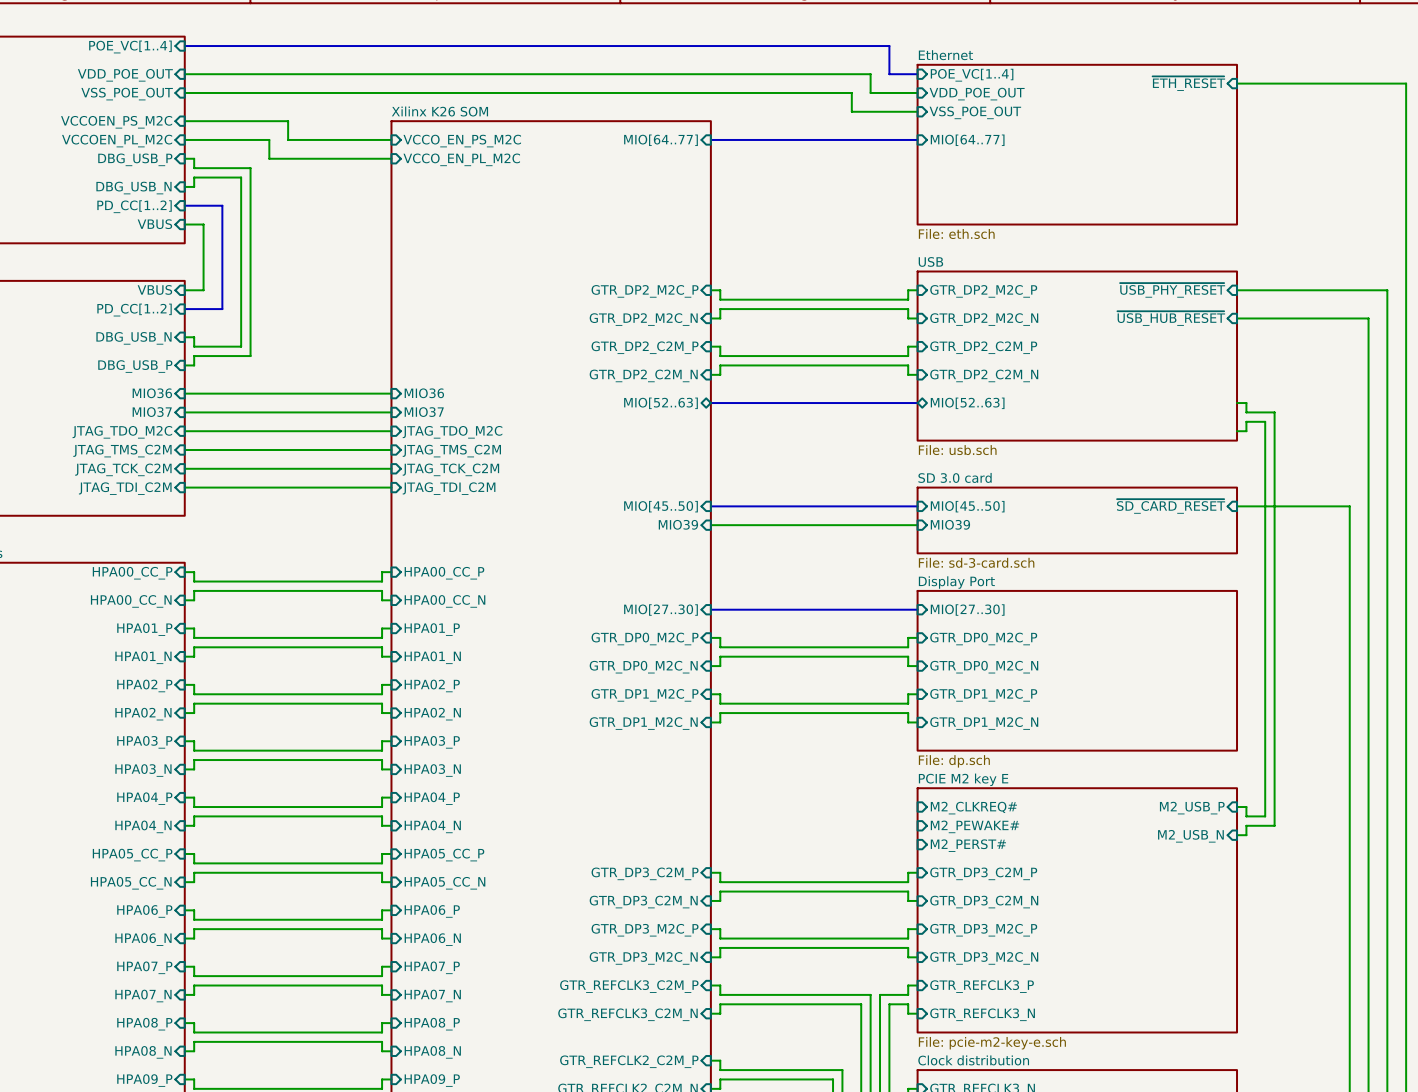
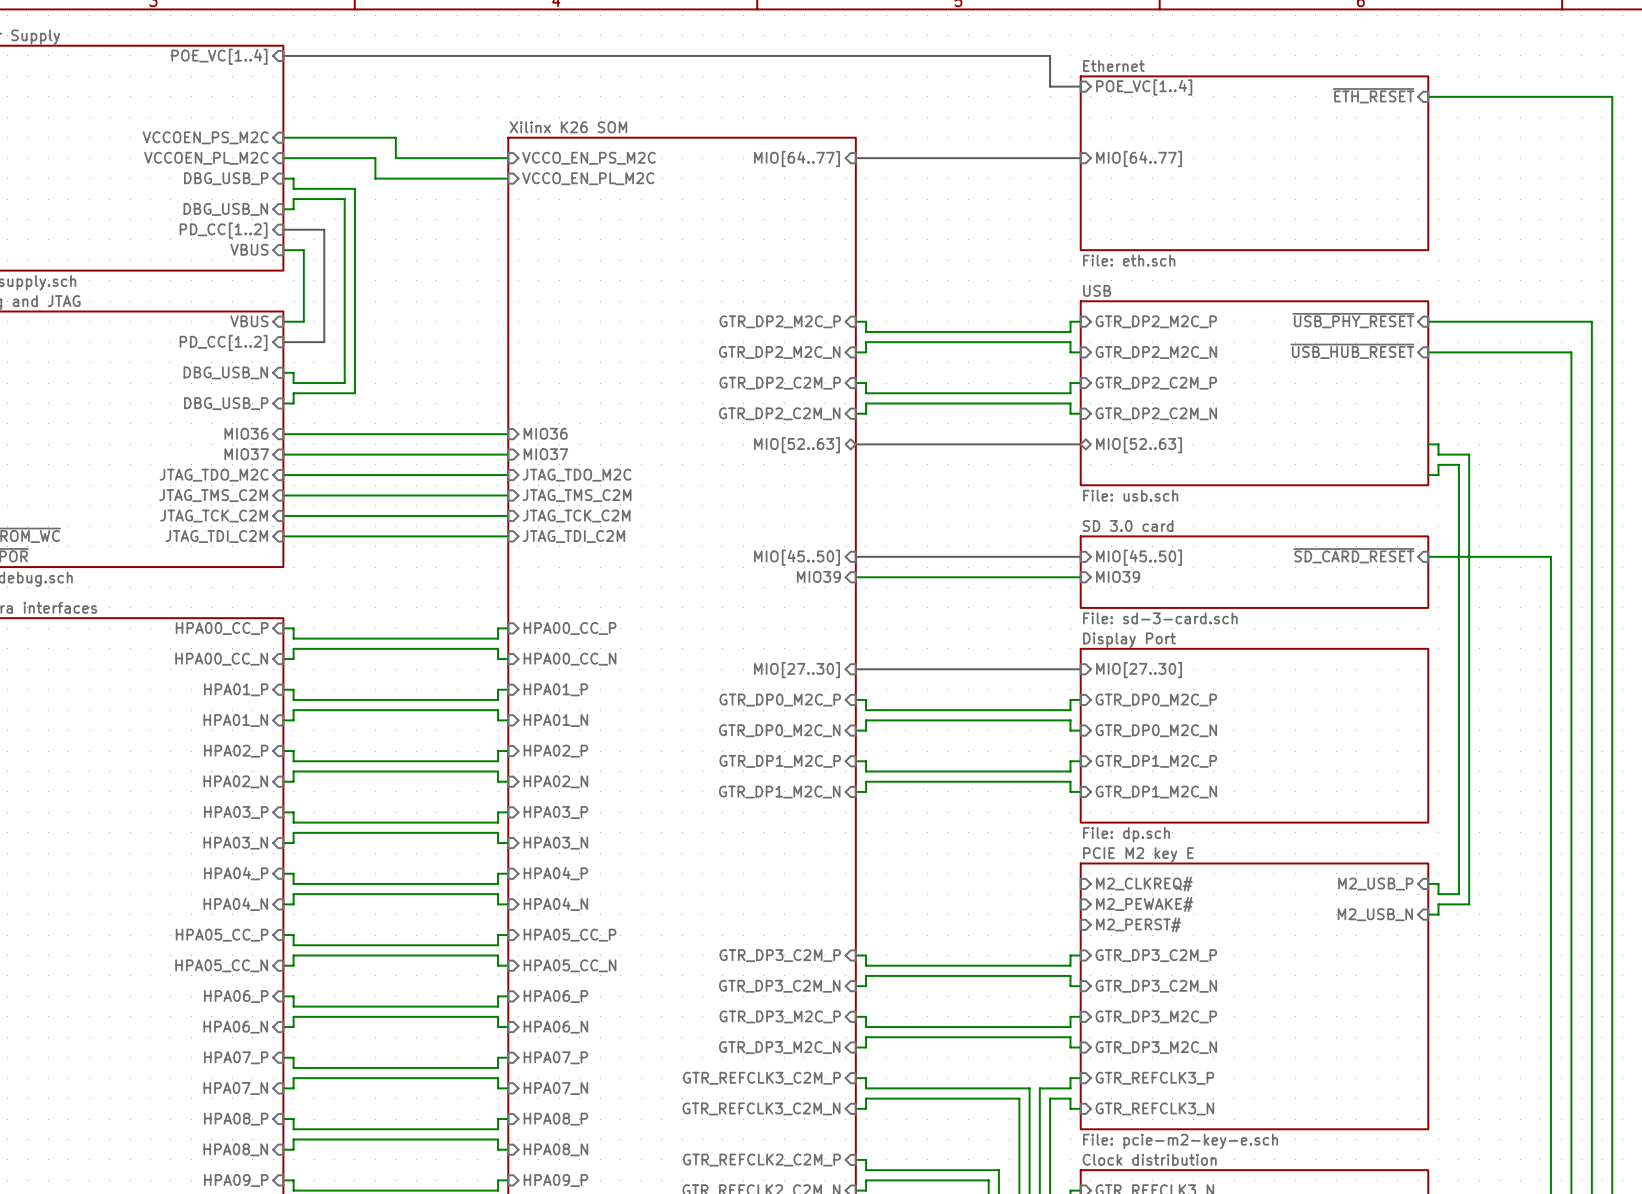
wire: (184, 74) (870, 74) (870, 92) (917, 92) -> none
sheet pin: VDD_POE_OUT (125, 75) -> none
wire: (184, 92) (851, 92) (851, 111) (917, 111) -> none
sheet pin: VSS_POE_OUT (127, 94) -> none
sheet pin: VDD_POE_OUT (977, 94) -> none
sheet pin: VSS_POE_OUT (975, 112) -> none

